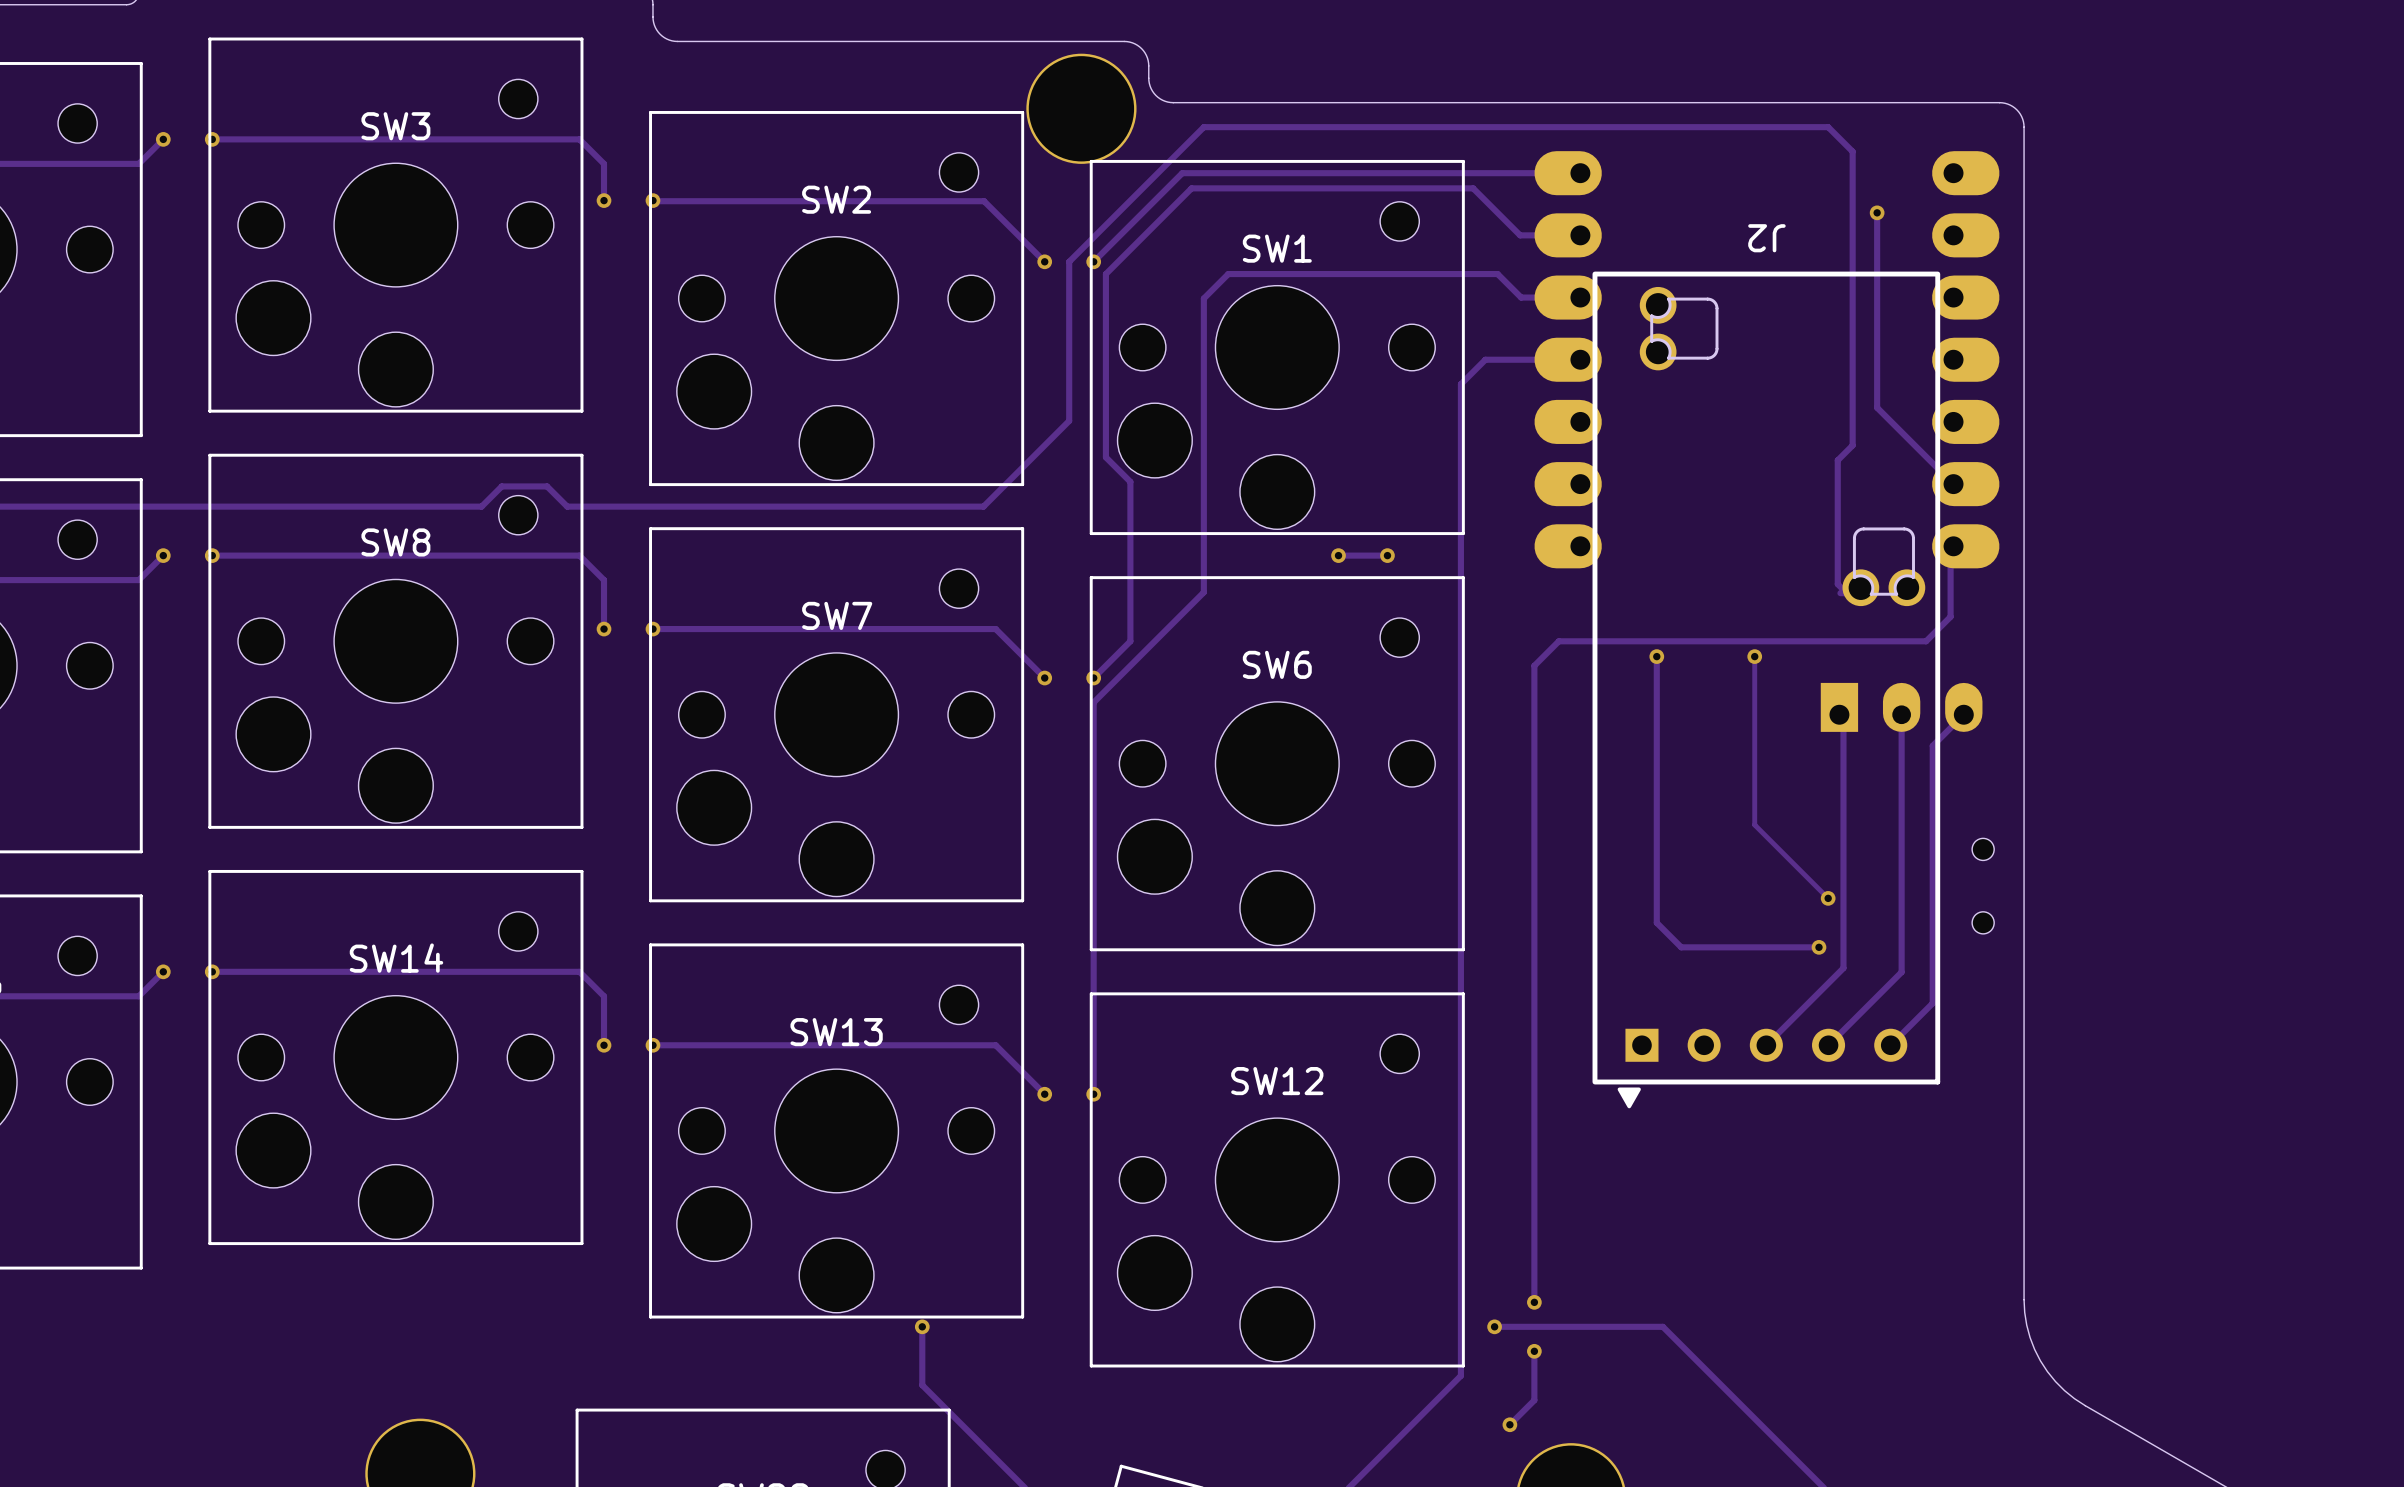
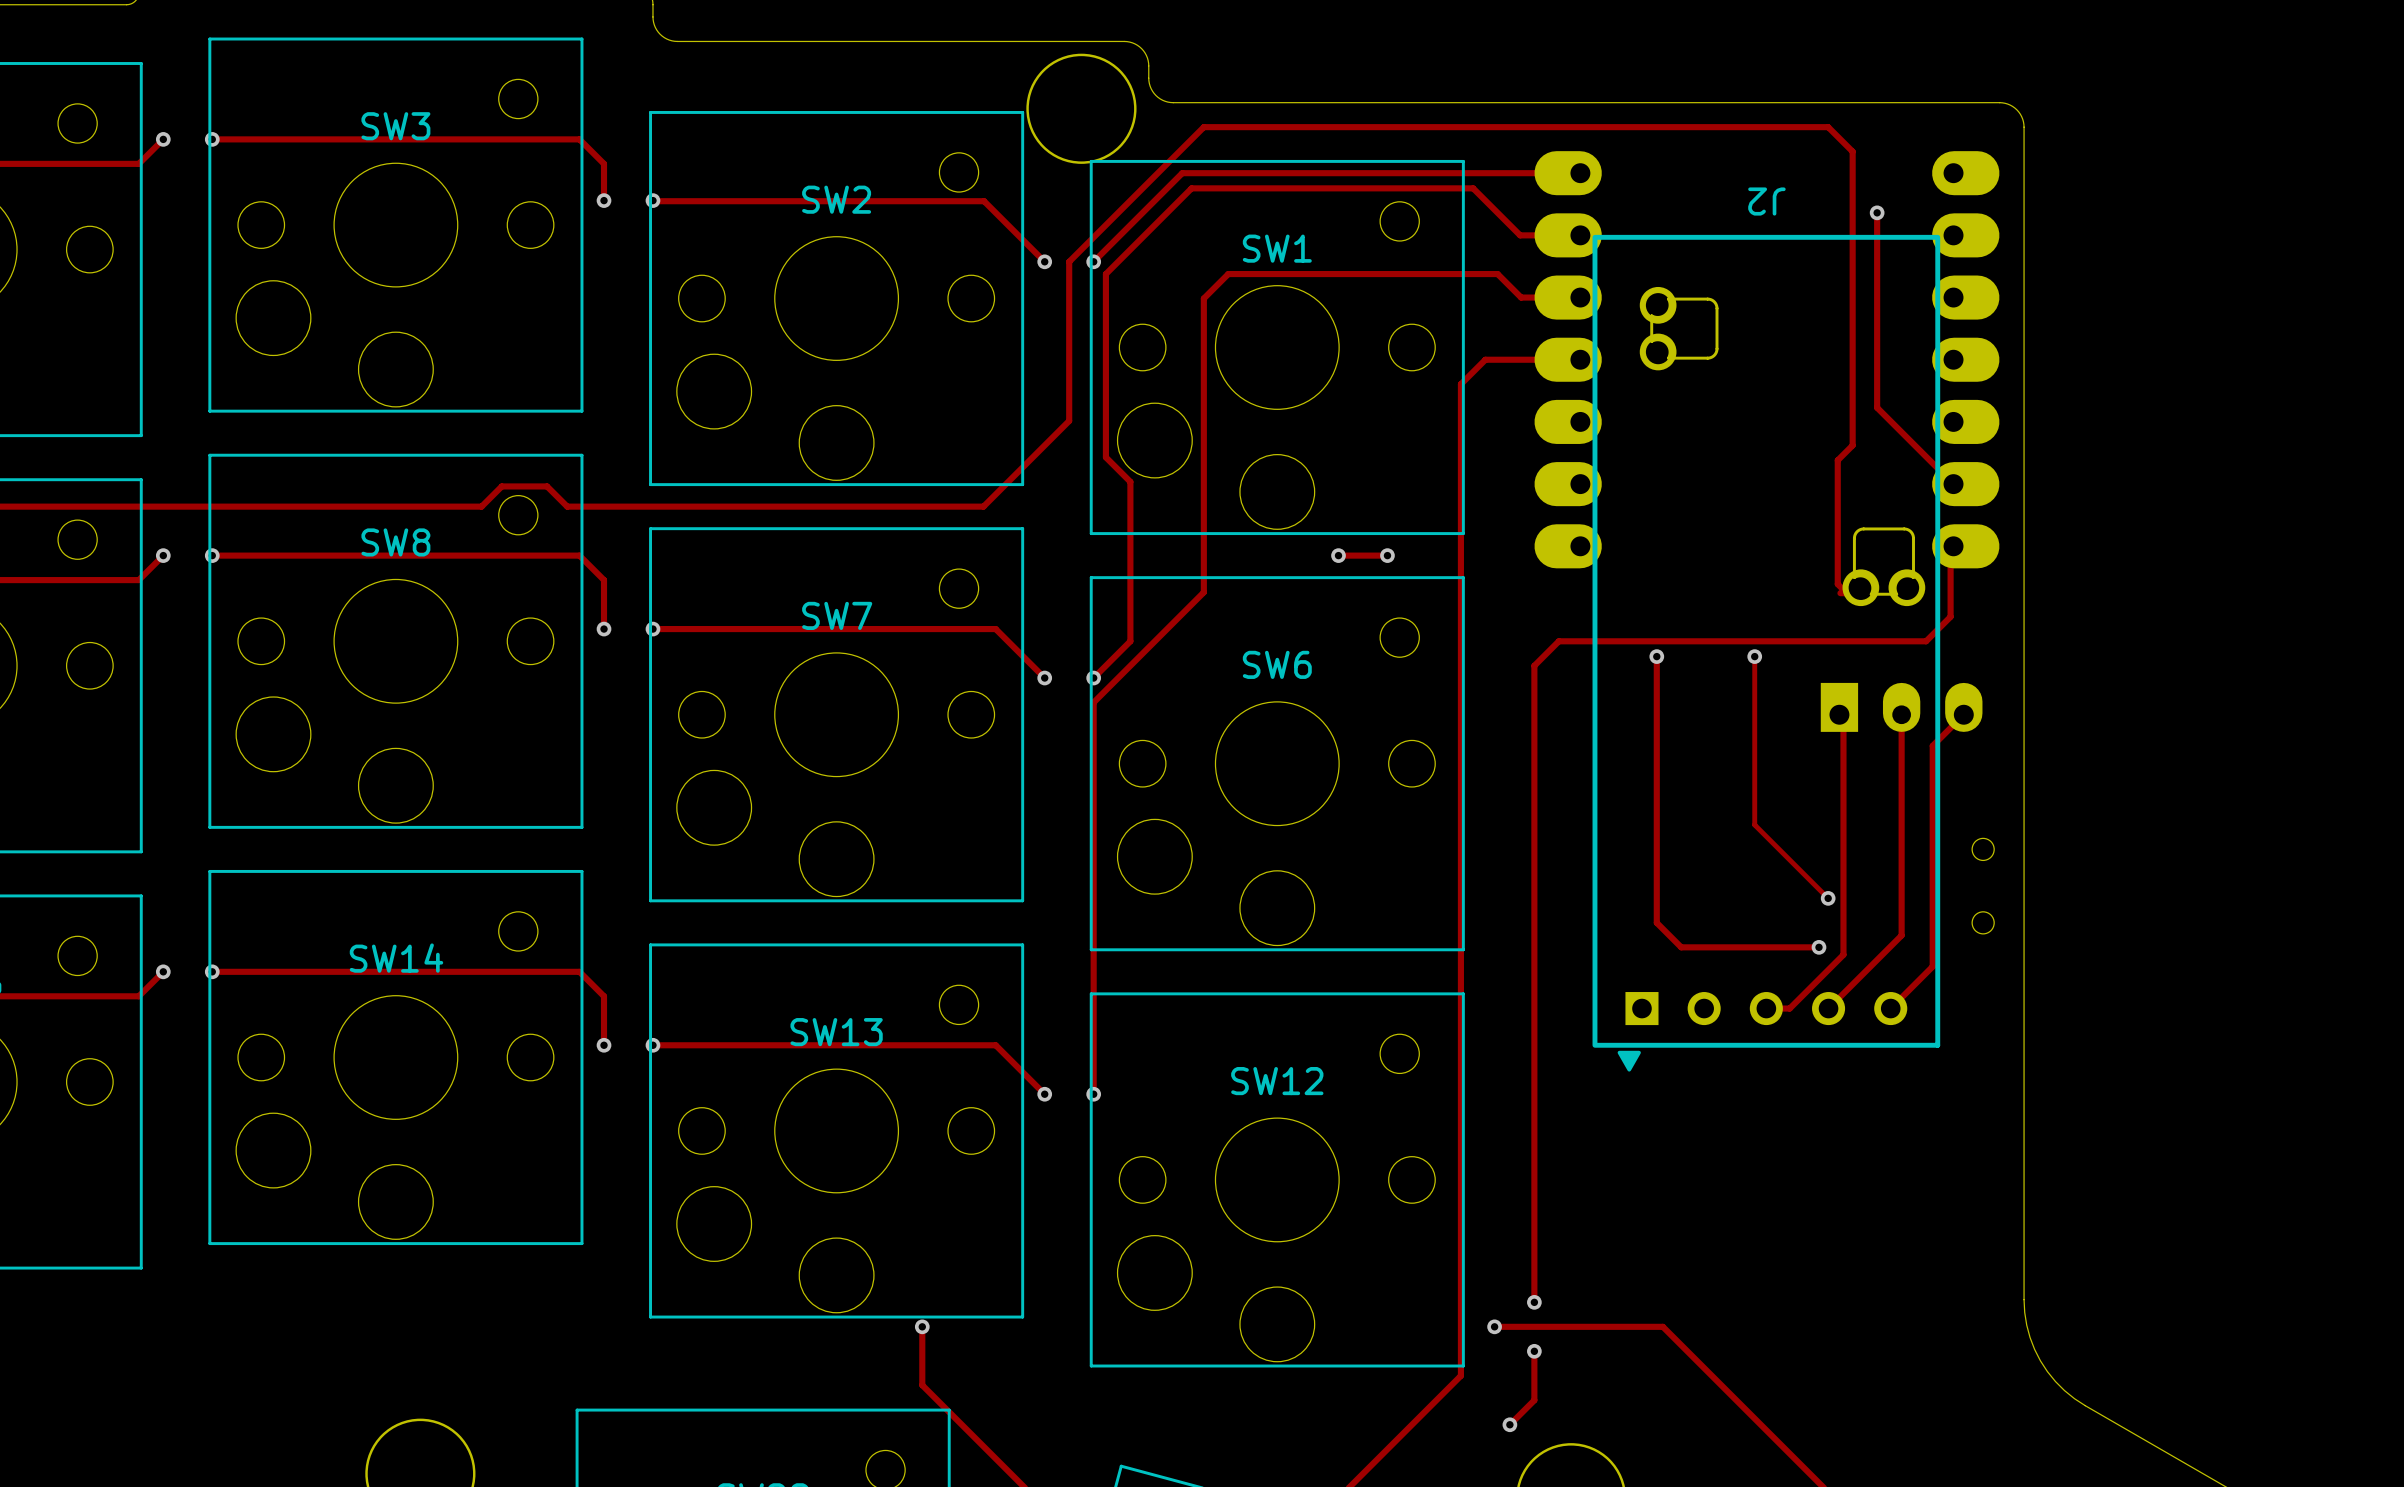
J2 position: (1766, 689) -> (1766, 653)
track: (1901, 935) (1901, 972) (1828, 1045) -> (1901, 935) (1828, 1008)
track: (1843, 954) (1843, 968) (1766, 1045) -> (1843, 954) (1789, 1008) (1766, 1008)
track: (1932, 966) (1932, 1003) (1890, 1045) -> (1932, 966) (1890, 1008)

